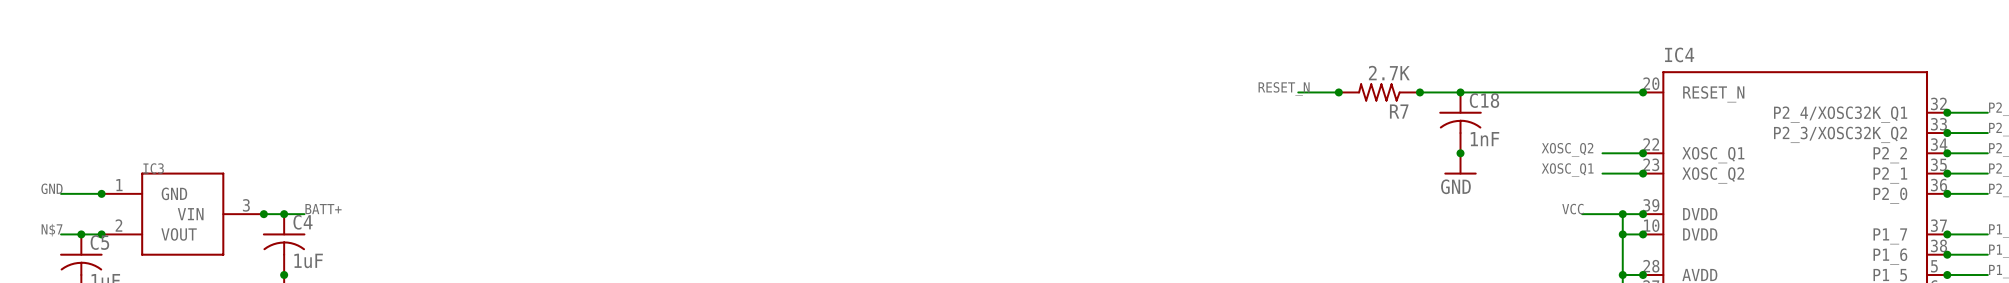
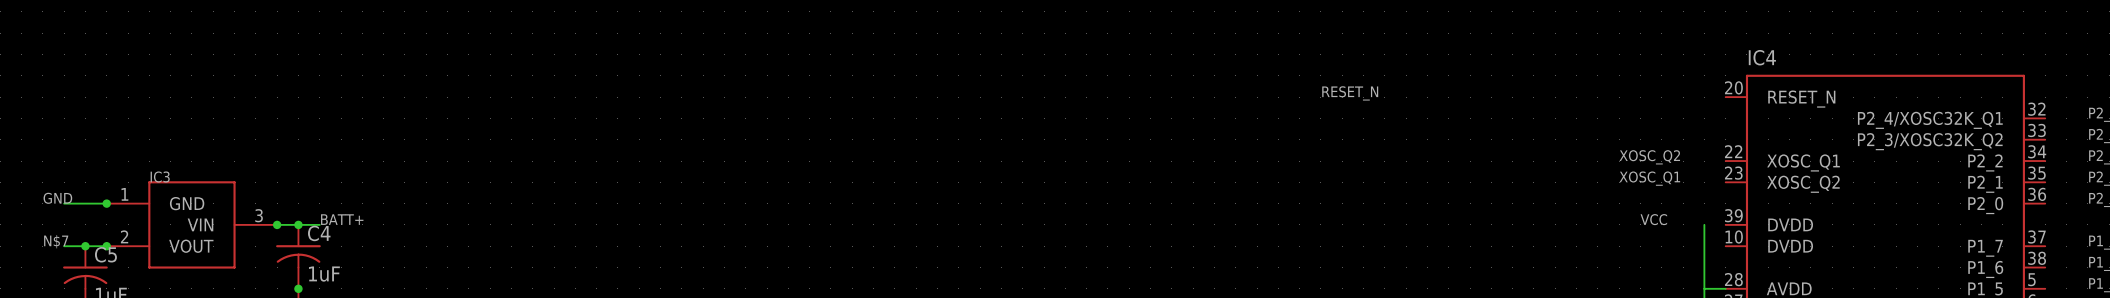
wire: (1298, 92) (1338, 92) -> none
junction: (1338, 92) -> none
R7: 2.7K (1379, 92) -> none
wire: (1419, 92) (1643, 92) -> none
junction: (1419, 92) -> none
junction: (1460, 92) -> none
junction: (1643, 92) -> none
wire: (1947, 112) (1987, 112) -> none
junction: (1947, 112) -> none
C18: 1nF (1460, 122) -> none
wire: (1947, 133) (1987, 133) -> none
junction: (1947, 133) -> none
junction: (1460, 153) -> none
wire: (1602, 153) (1643, 153) -> none
junction: (1643, 153) -> none
wire: (1947, 153) (1987, 153) -> none
junction: (1947, 153) -> none
power symbol: GND (1460, 163) -> none
wire: (1602, 173) (1643, 173) -> none
junction: (1643, 173) -> none
wire: (1947, 173) (1987, 173) -> none
junction: (1947, 173) -> none
wire: (1947, 193) (1987, 193) -> none
junction: (1947, 193) -> none
wire: (1582, 214) (1643, 214) -> none
junction: (1622, 214) -> none
junction: (1643, 214) -> none
wire: (1622, 234) (1643, 234) -> none
junction: (1622, 234) -> none
junction: (1643, 234) -> none
wire: (1947, 234) (1987, 234) -> none
junction: (1947, 234) -> none
wire: (1947, 254) (1987, 254) -> none
junction: (1947, 254) -> none
junction: (1622, 274) -> none
junction: (1643, 274) -> none
wire: (1947, 274) (1987, 274) -> none
junction: (1947, 274) -> none

